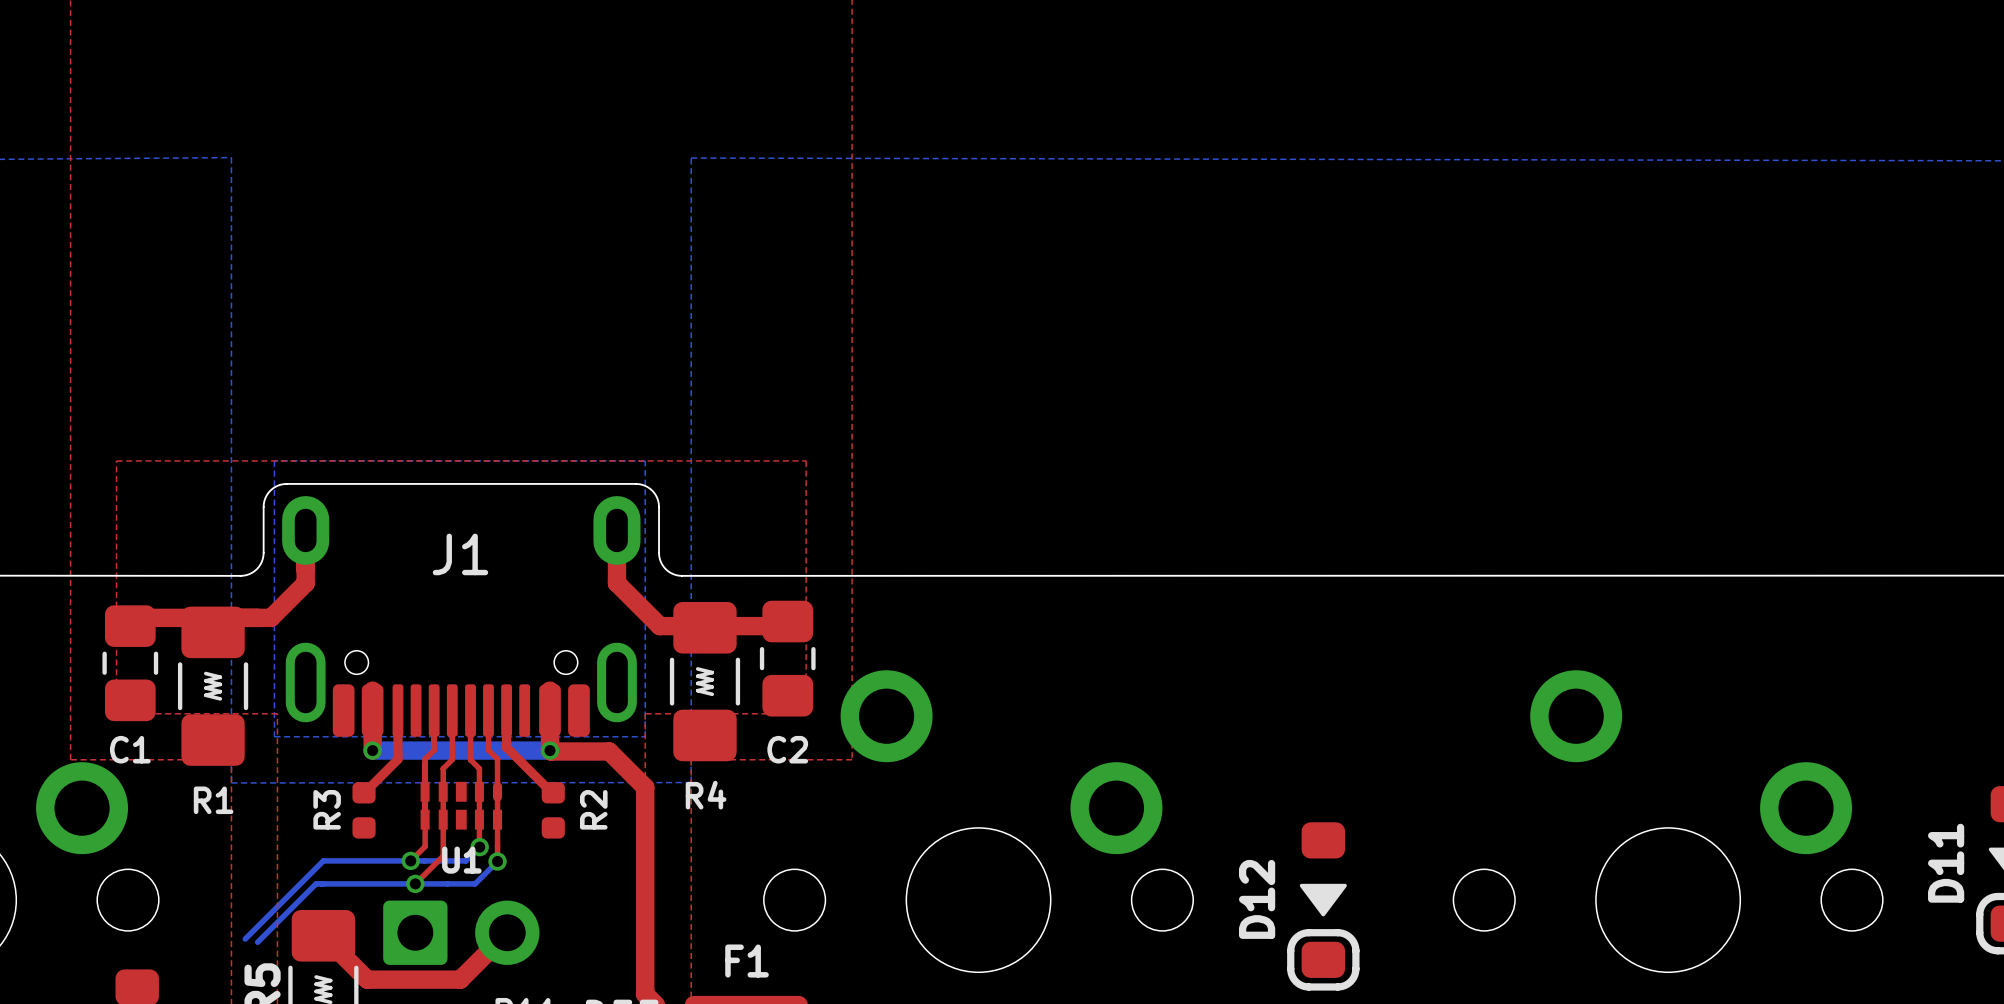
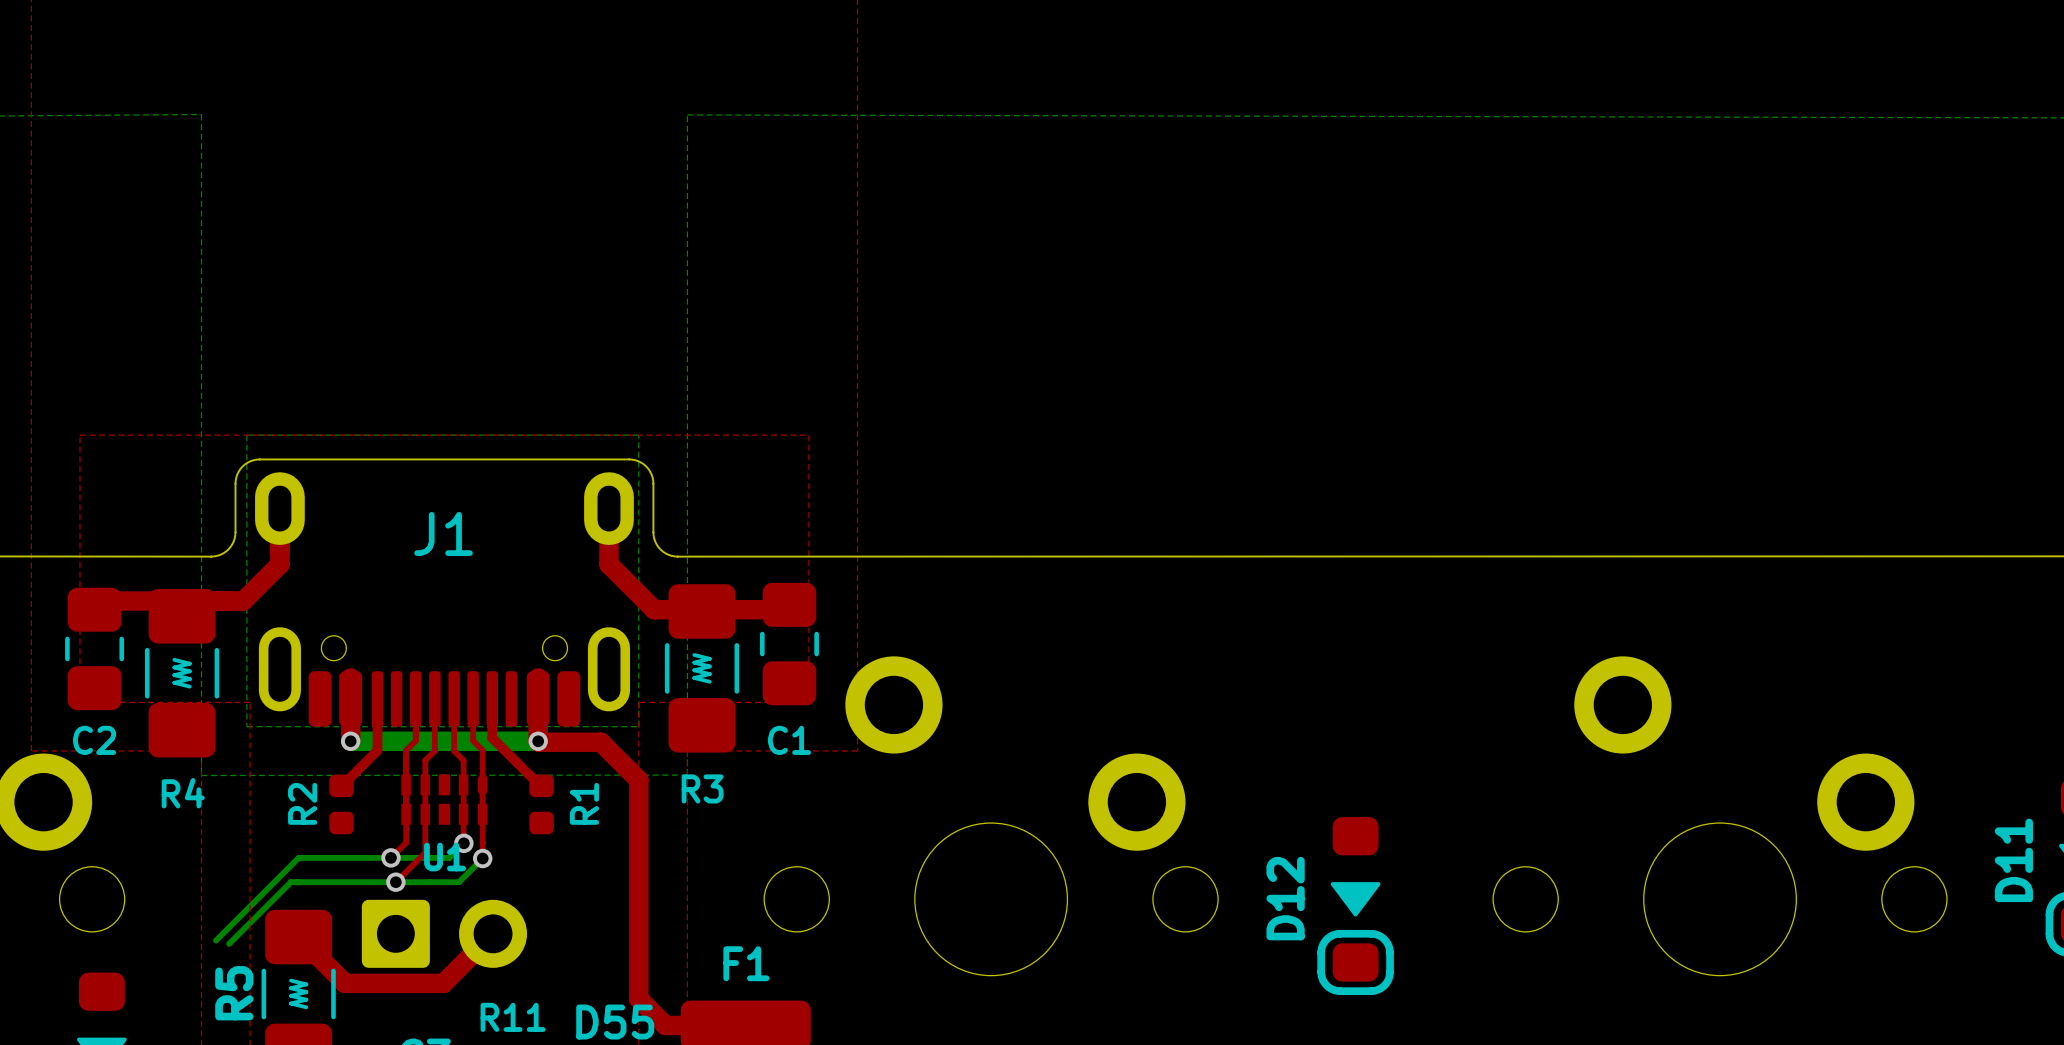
C1 name: C1 (130, 749) -> C2 (94, 740)
C2 name: C2 (787, 749) -> C1 (789, 740)
R4 name: R4 (706, 795) -> R3 (702, 788)
R1 name: R1 (213, 800) -> R4 (183, 793)
R3 name: R3 (327, 809) -> R2 (302, 803)
R2 name: R2 (593, 809) -> R1 (584, 803)

